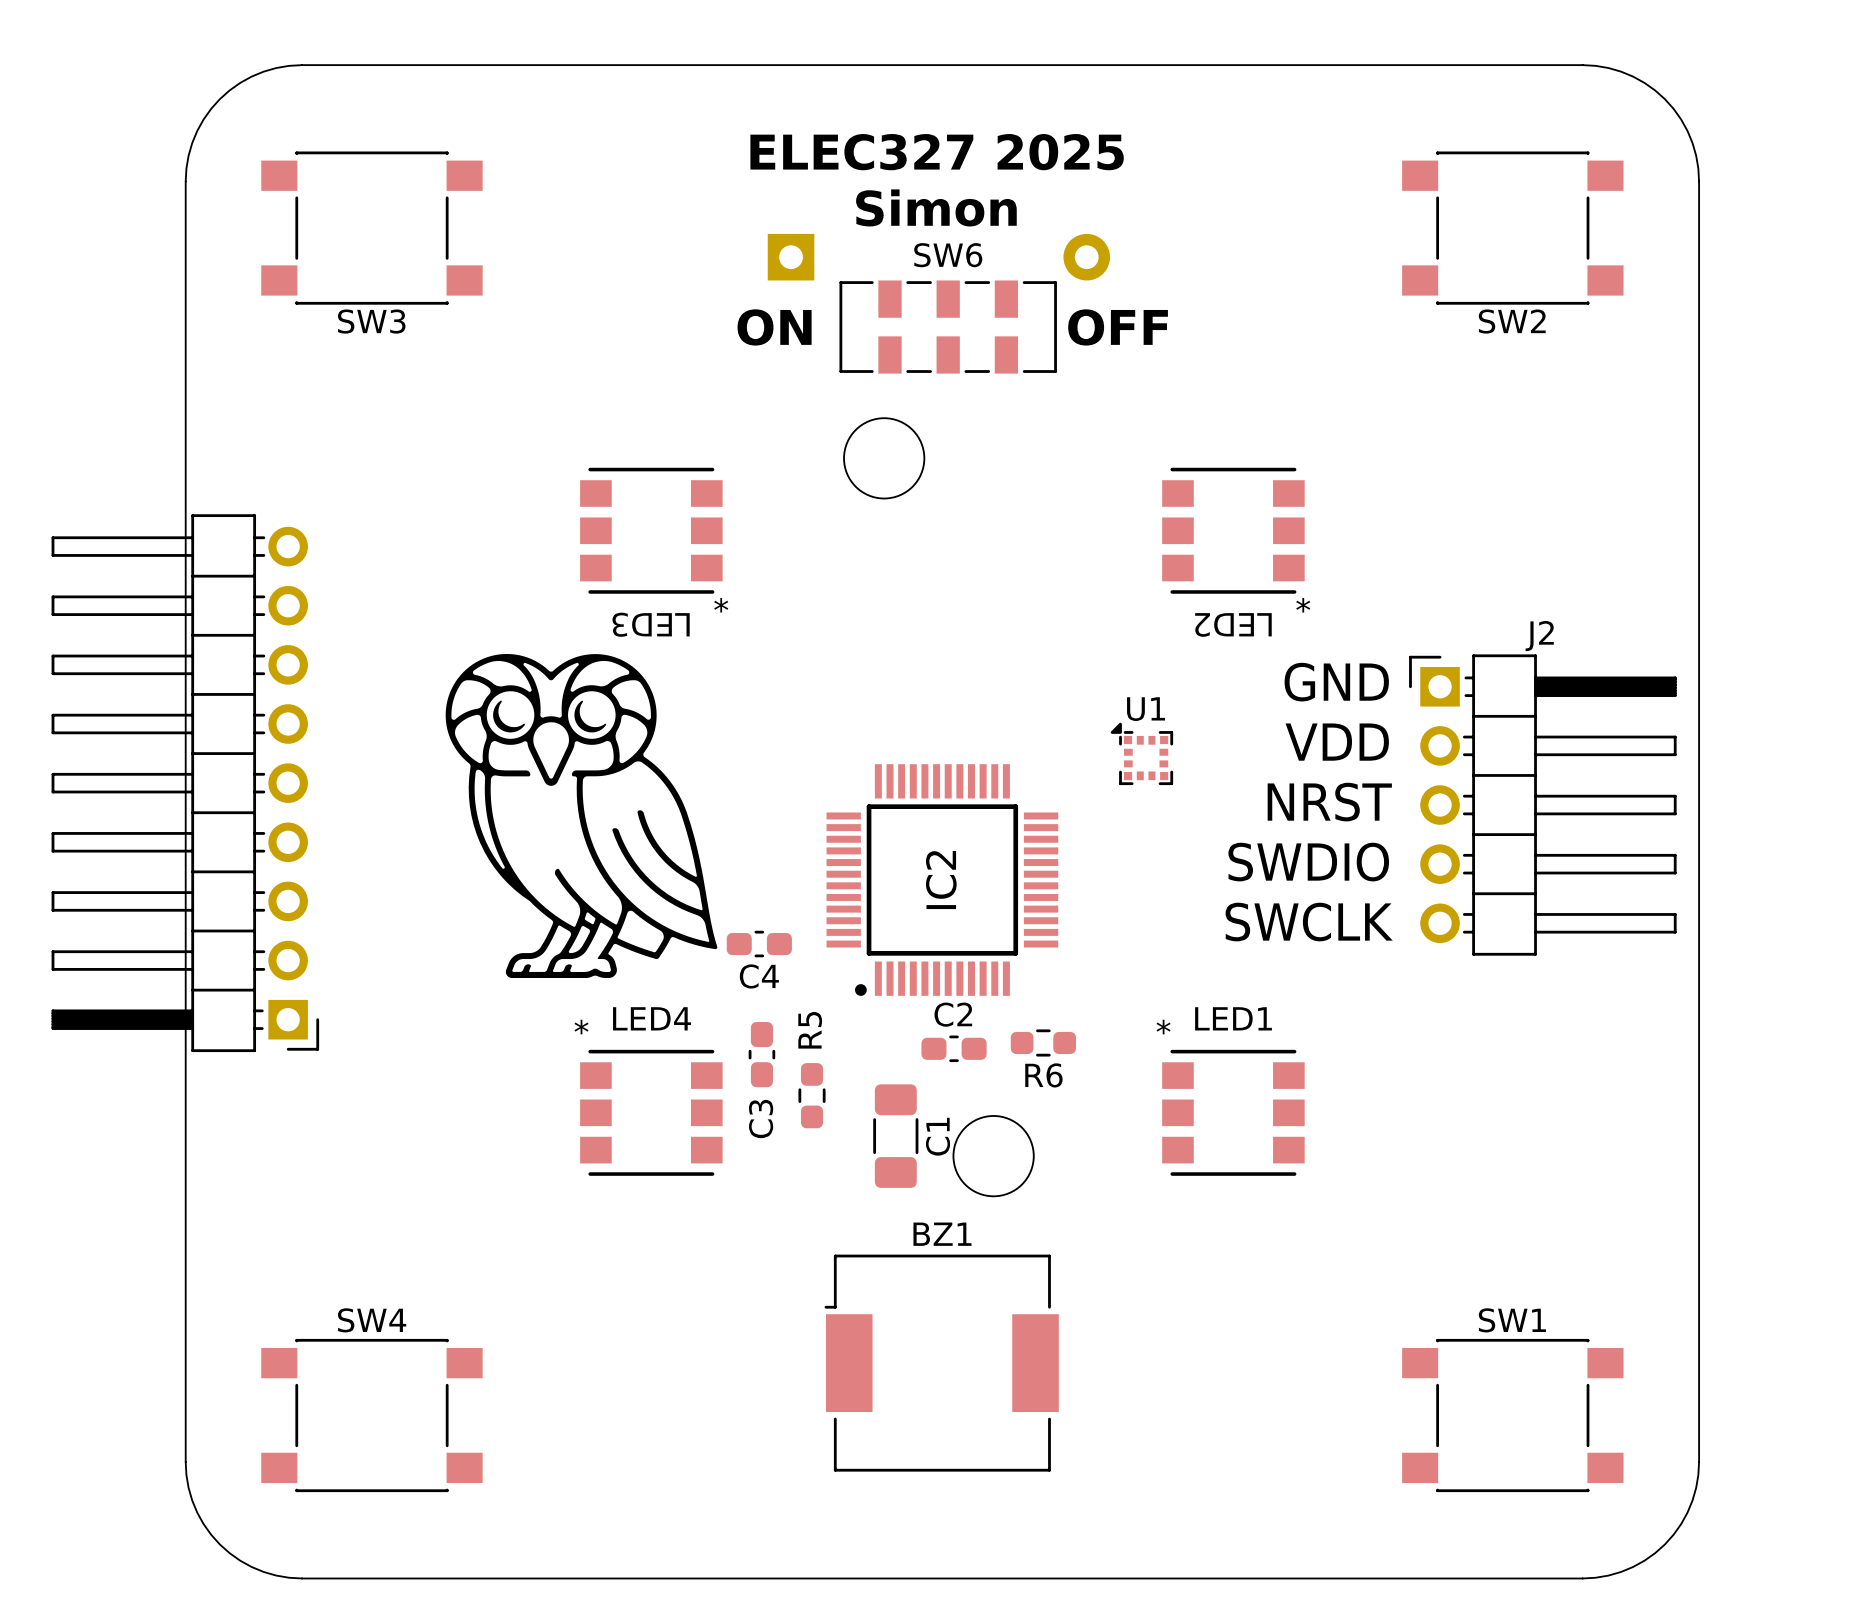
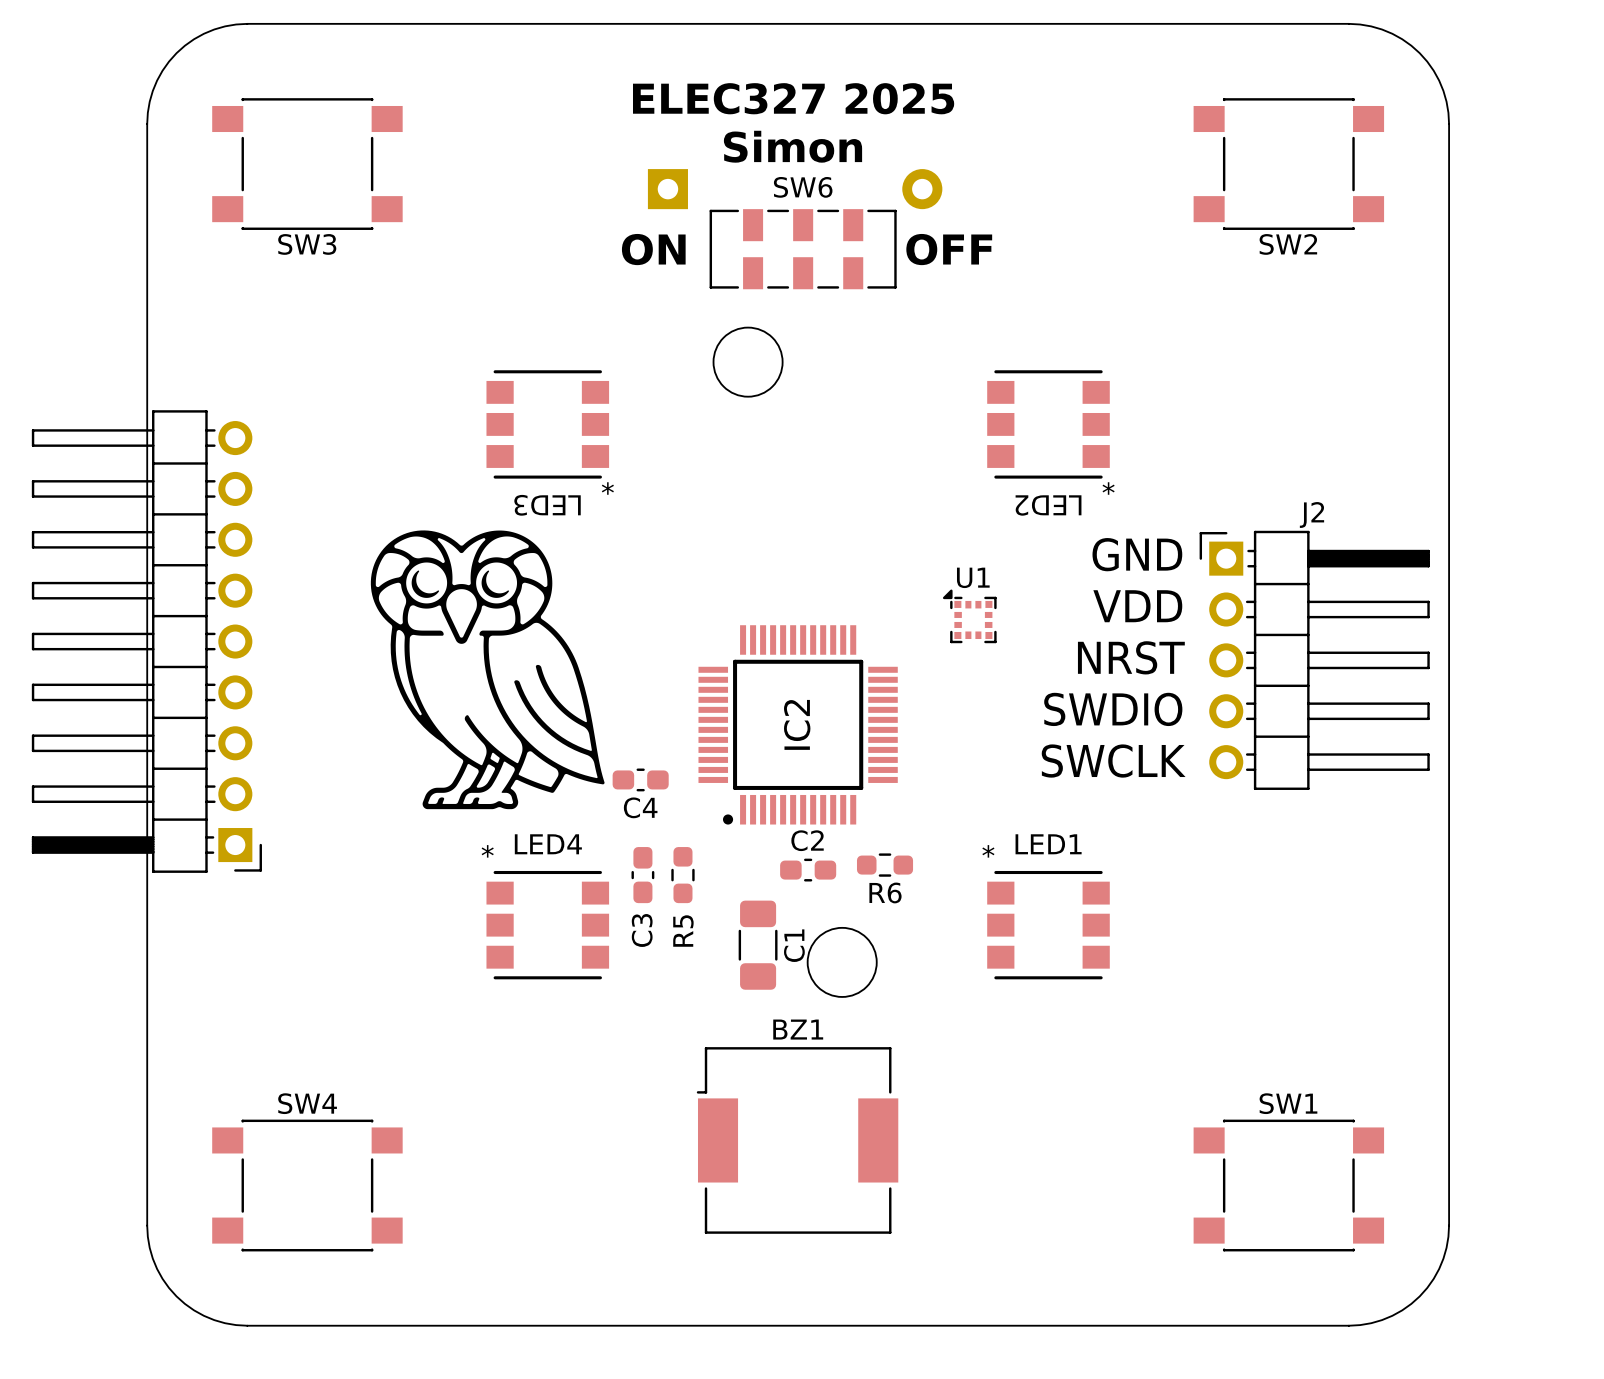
R5 name position: R5 (810, 1030) -> R5 (683, 931)
R5 position: (812, 1095) -> (682, 875)

